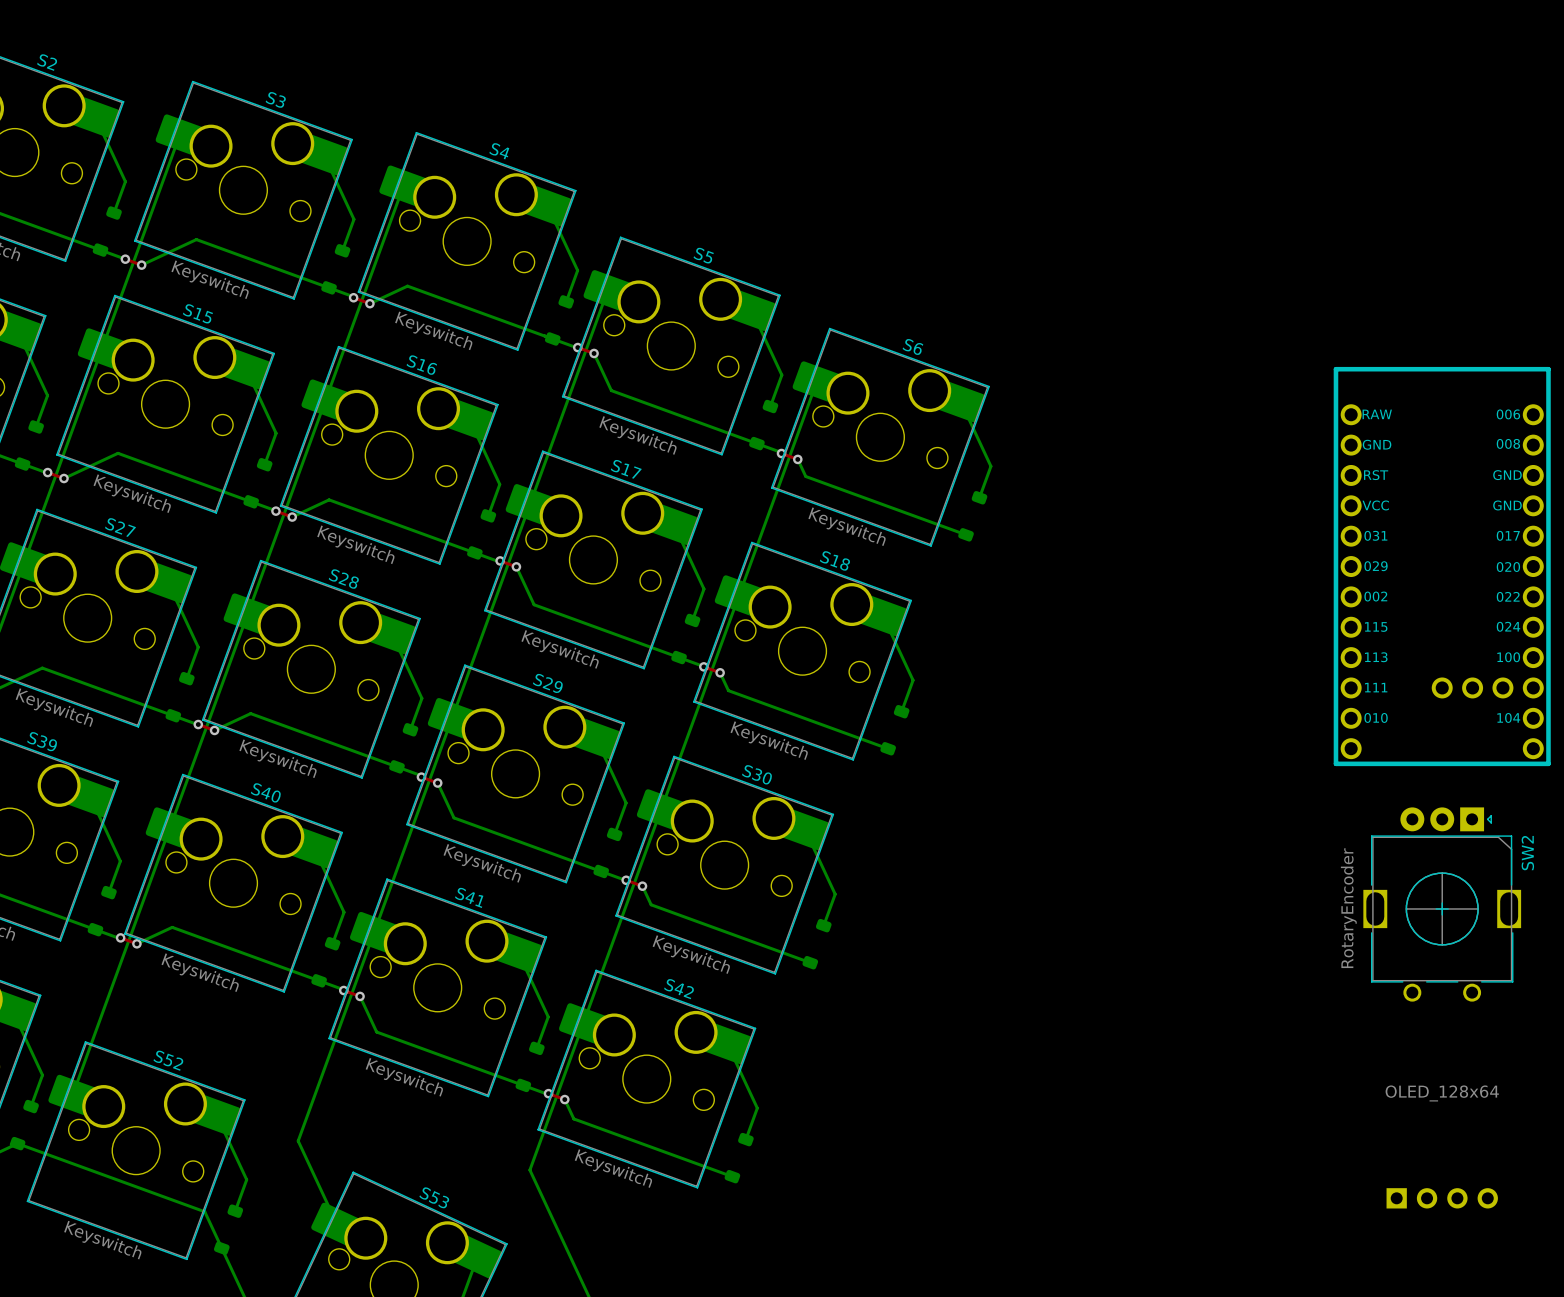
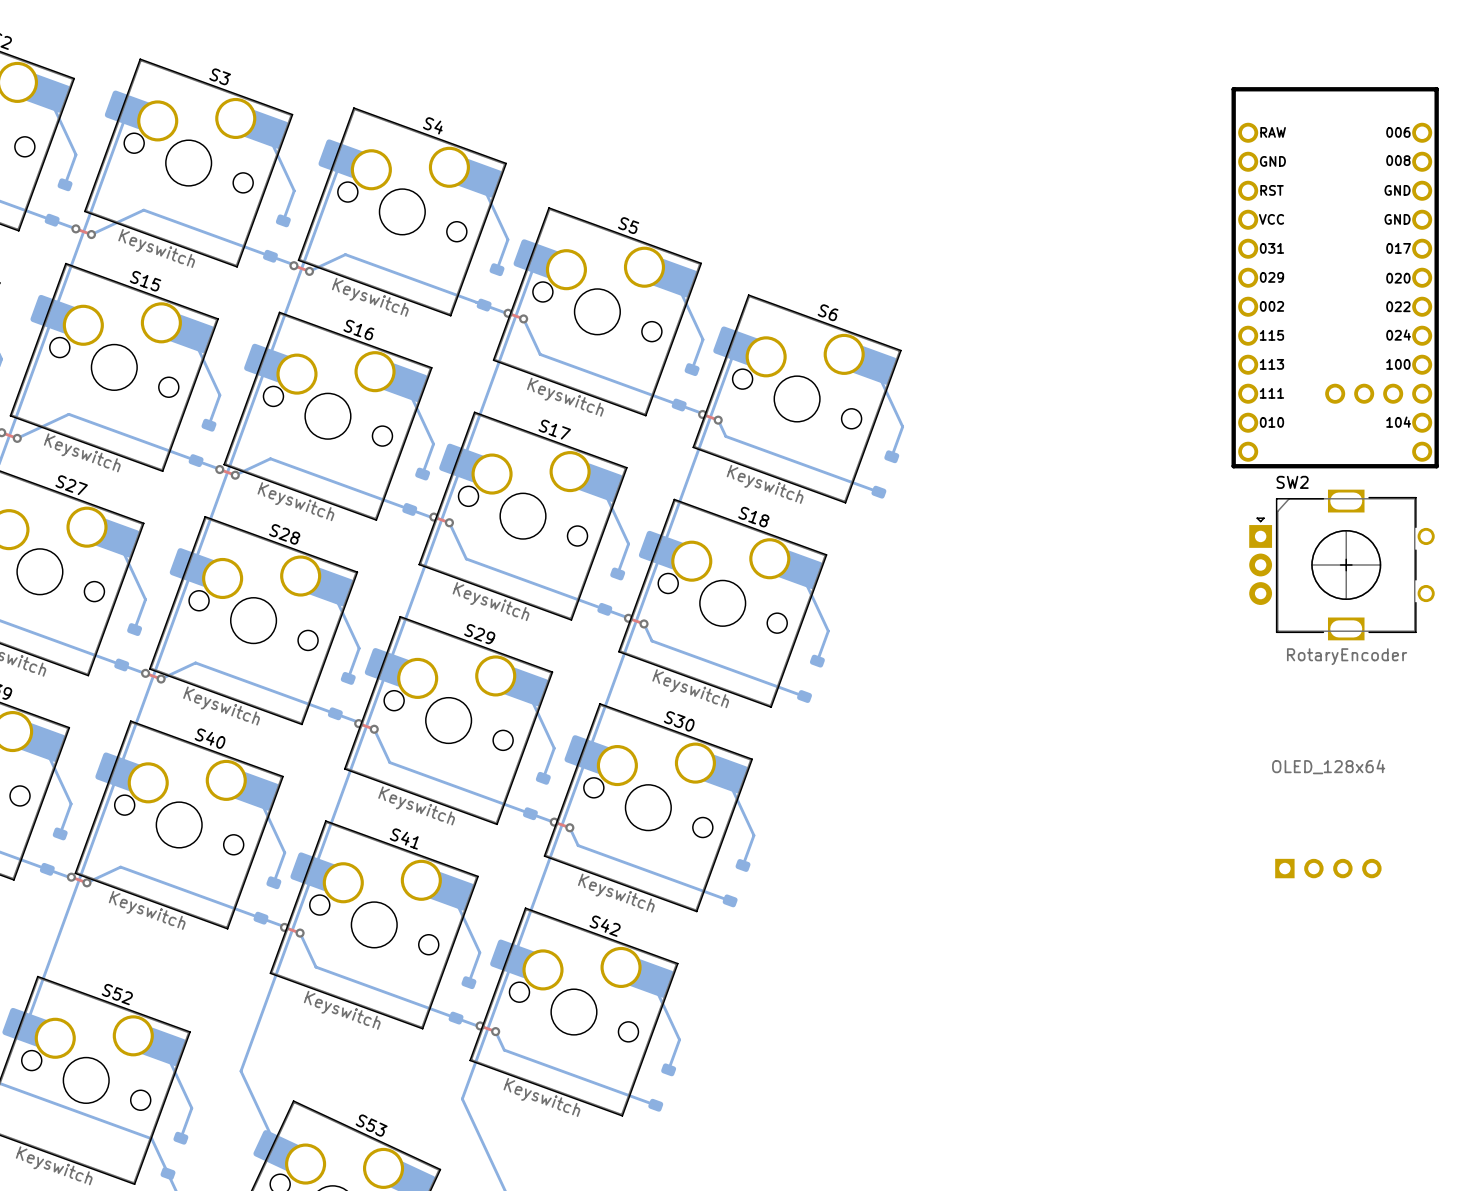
part position: (1442, 566) -> (1335, 277)
SW2 rotation: 0° (1442, 904) -> 90° counterclockwise (1341, 564)
SW2 position: (1442, 904) -> (1341, 564)
part position: (1442, 1198) -> (1328, 868)

